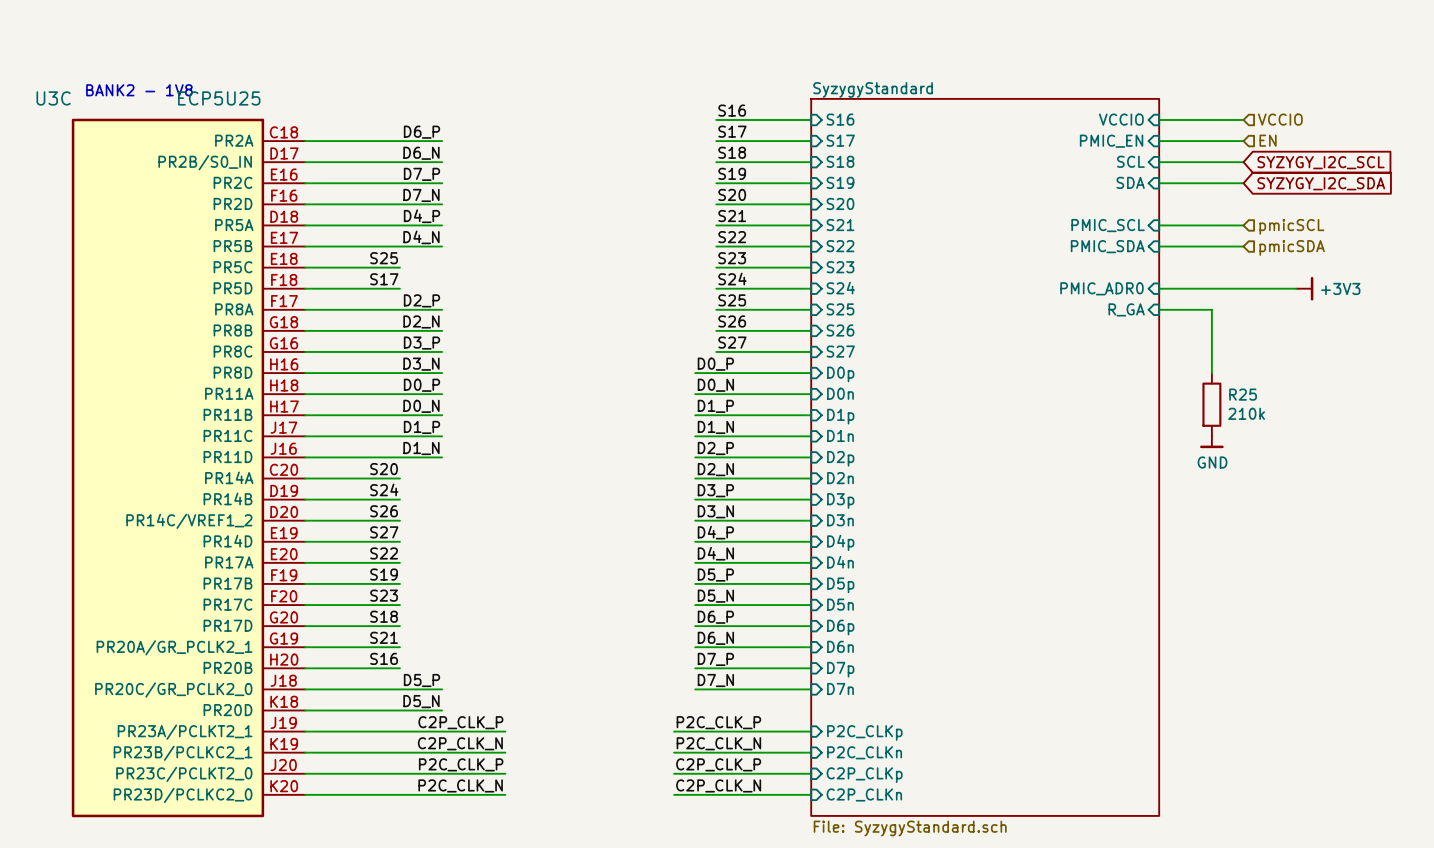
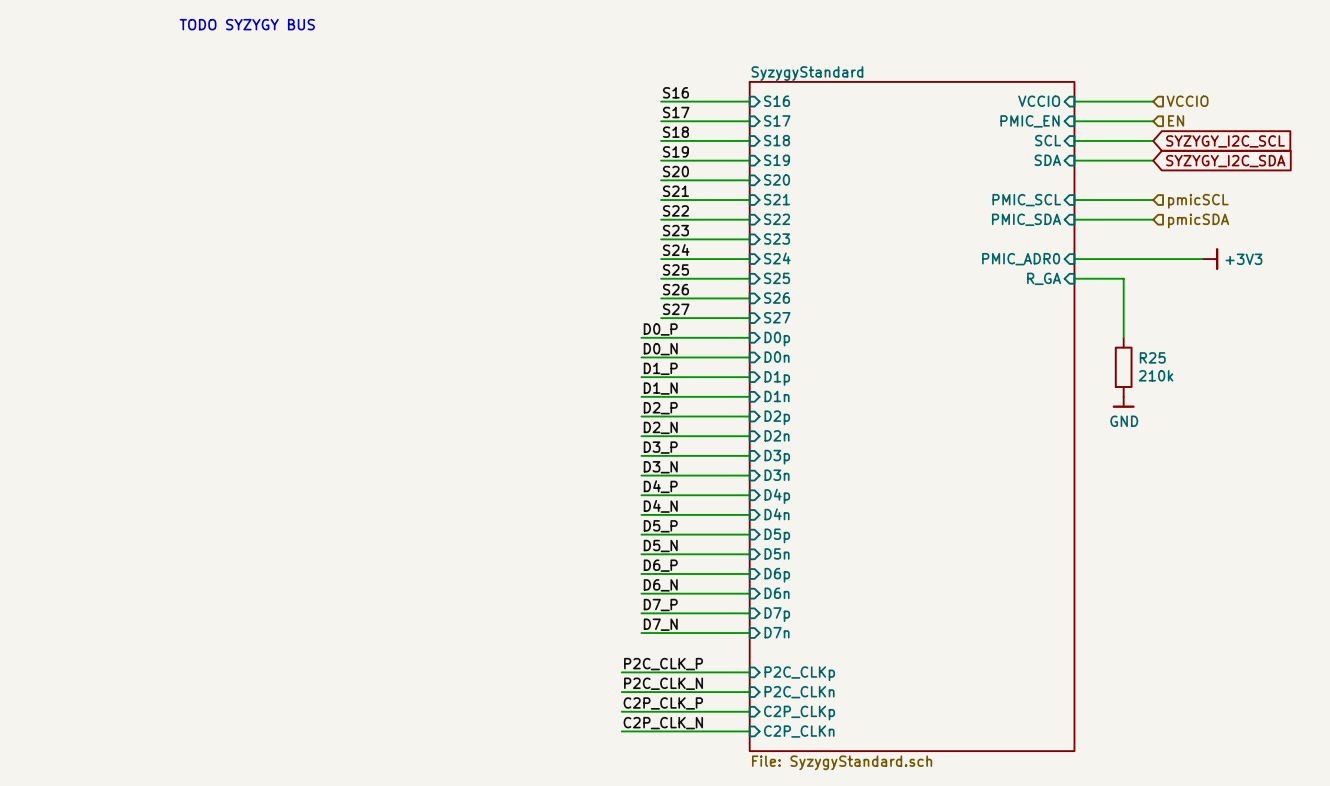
text: none -> TODO SYZYGY BUS (247, 24)
text: BANK2 - 1V8 (139, 90) -> none
label: D6_P (421, 132) -> none
wire: (305, 141) (442, 141) -> none
label: D6_N (421, 153) -> none
wire: (305, 162) (442, 162) -> none
label: D7_P (421, 174) -> none
wire: (305, 183) (442, 183) -> none
label: D7_N (421, 195) -> none
wire: (305, 204) (442, 204) -> none
label: D4_P (421, 216) -> none
wire: (305, 225) (442, 225) -> none
label: D4_N (421, 237) -> none
wire: (305, 246) (442, 246) -> none
label: S25 (384, 258) -> none
wire: (305, 267) (399, 267) -> none
label: S17 (384, 279) -> none
wire: (305, 288) (399, 288) -> none
label: D2_P (421, 300) -> none
wire: (305, 309) (442, 309) -> none
label: D2_N (421, 321) -> none
wire: (305, 330) (442, 330) -> none
label: D3_P (421, 343) -> none
wire: (305, 351) (442, 351) -> none
label: D3_N (421, 364) -> none
wire: (305, 373) (442, 373) -> none
label: D0_P (421, 385) -> none
wire: (305, 394) (442, 394) -> none
label: D0_N (421, 406) -> none
wire: (305, 415) (442, 415) -> none
label: D1_P (421, 427) -> none
wire: (305, 436) (442, 436) -> none
label: D1_N (421, 448) -> none
wire: (305, 457) (442, 457) -> none
U3C: ECP5U25 (188, 467) -> none
label: S20 (384, 469) -> none
wire: (305, 478) (399, 478) -> none
label: S24 (384, 489) -> none
wire: (305, 499) (399, 499) -> none
label: S26 (384, 511) -> none
wire: (305, 520) (399, 520) -> none
label: S27 (384, 532) -> none
wire: (305, 541) (399, 541) -> none
label: S22 (384, 553) -> none
wire: (305, 562) (399, 562) -> none
label: S19 (384, 574) -> none
wire: (305, 583) (399, 583) -> none
label: S23 (384, 595) -> none
wire: (305, 605) (399, 605) -> none
label: S18 (384, 616) -> none
wire: (305, 626) (399, 626) -> none
label: S21 (384, 637) -> none
wire: (305, 647) (399, 647) -> none
label: S16 (384, 658) -> none
wire: (305, 668) (399, 668) -> none
label: D5_P (421, 680) -> none
wire: (305, 689) (442, 689) -> none
label: D5_N (421, 701) -> none
wire: (305, 710) (442, 710) -> none
label: C2P_CLK_P (460, 722) -> none
wire: (305, 731) (505, 731) -> none
label: C2P_CLK_N (460, 743) -> none
wire: (305, 752) (505, 752) -> none
label: P2C_CLK_P (461, 764) -> none
wire: (305, 773) (505, 773) -> none
label: P2C_CLK_N (460, 785) -> none
wire: (305, 794) (505, 794) -> none

